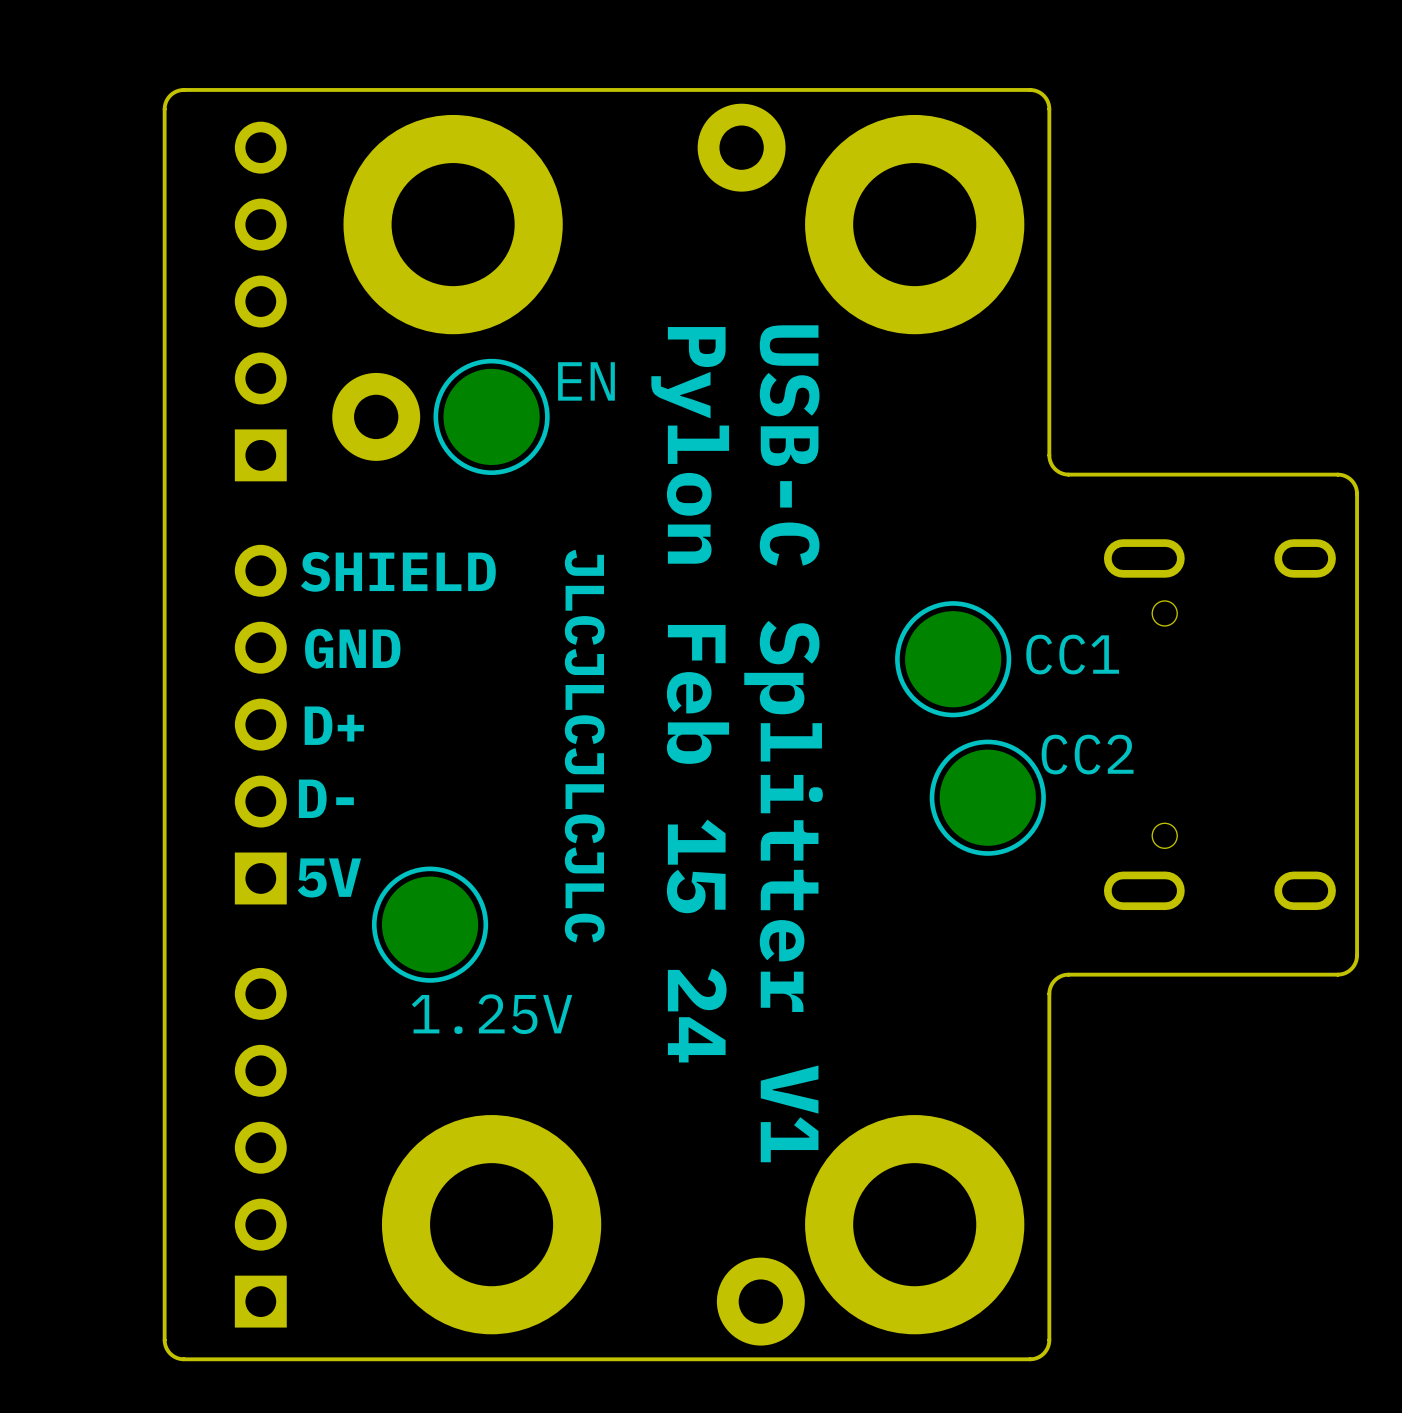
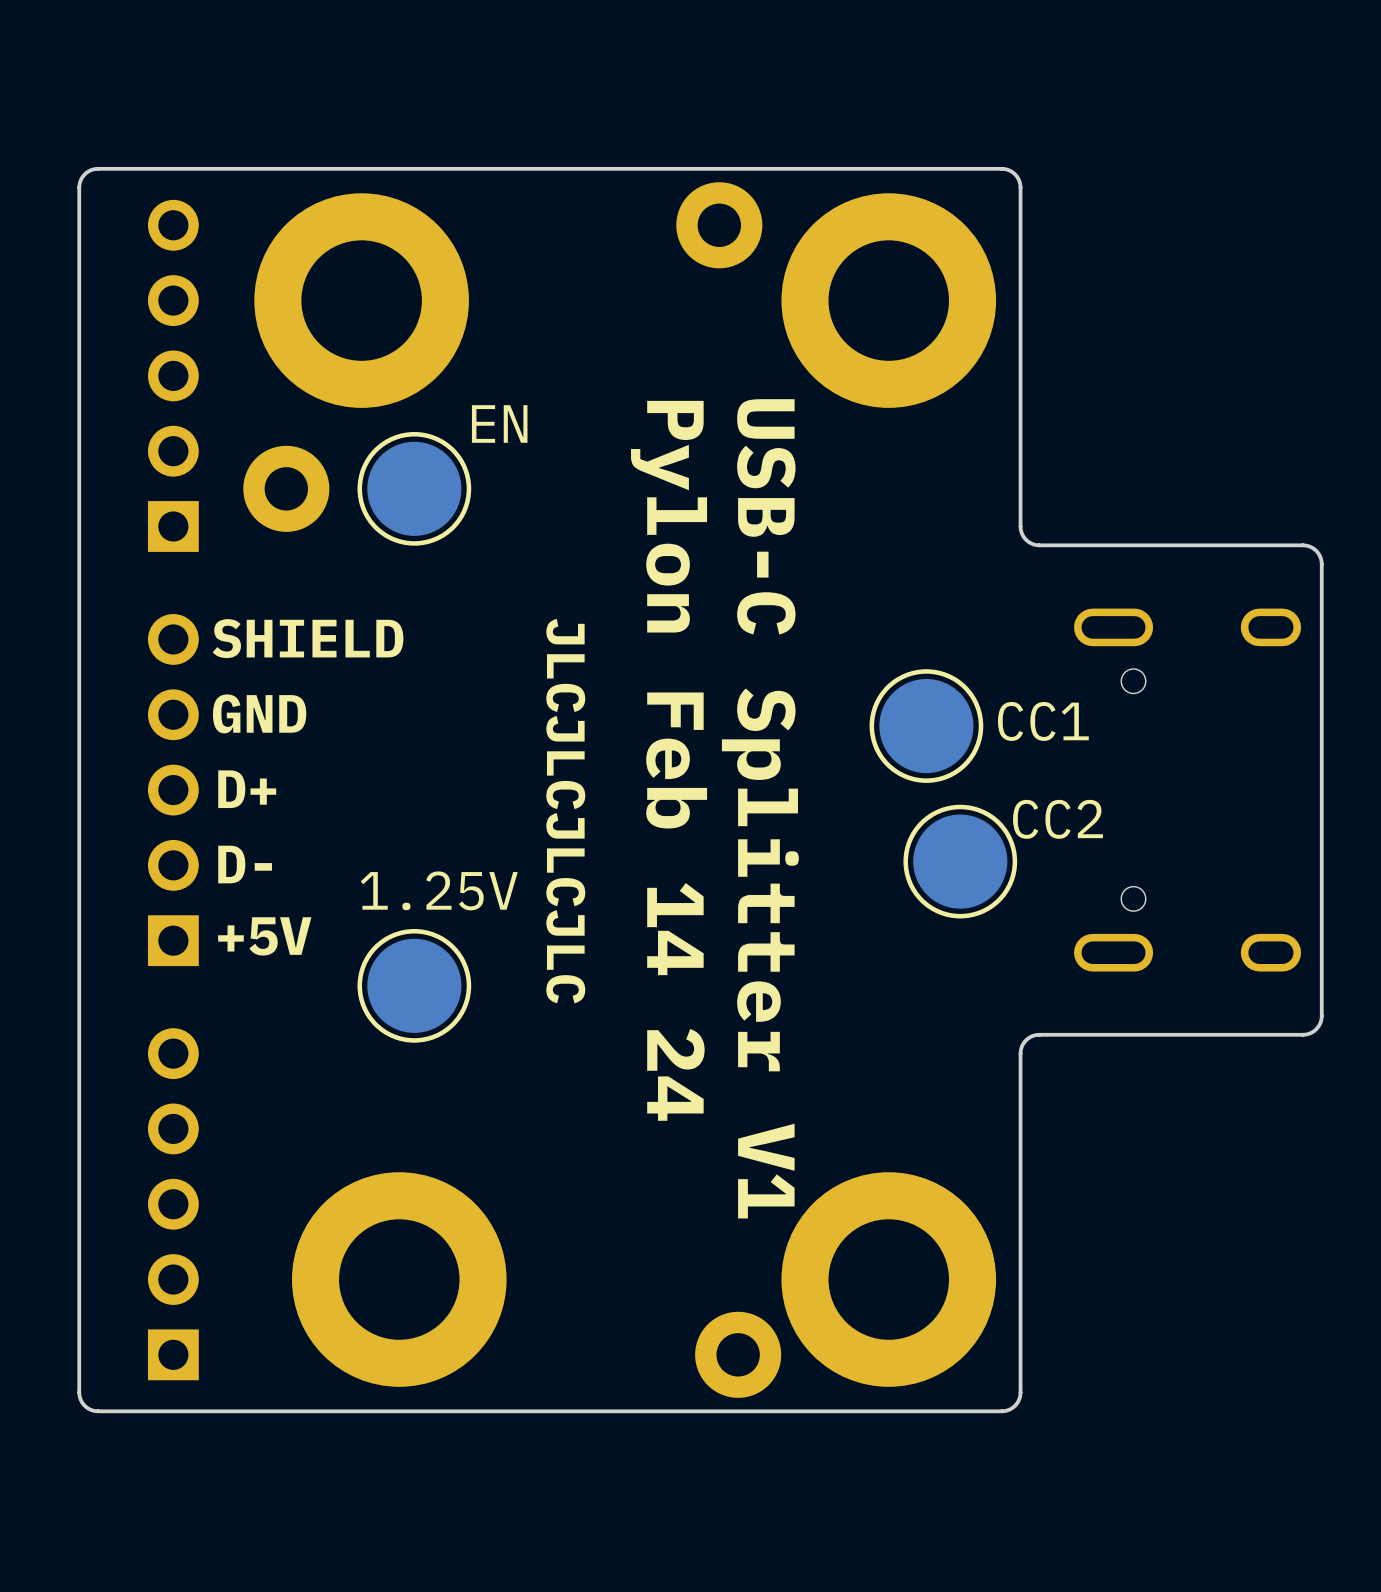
board edge: (183, 89) (170, 95) (164, 109) (164, 1340) (170, 1353) (183, 1359) -> (173, 168) (93, 169) (83, 176) (79, 187) (79, 1394) (84, 1405) (95, 1411) (173, 1411)
part position: (453, 224) -> (361, 300)
part position: (260, 301) -> (173, 375)
text position: EN (586, 381) -> EN (499, 423)
part position: (376, 416) -> (286, 488)
part position: (491, 416) -> (414, 488)
text position: SHIELD (398, 571) -> SHIELD (308, 638)
text position: GND (352, 648) -> GND (259, 713)
text: Pylon Feb 15 24 (690, 694) -> Pylon Feb 14 24 (669, 760)
part position: (260, 724) -> (173, 790)
text position: D+ (334, 725) -> D+ (247, 789)
text position: D- (326, 798) -> D- (245, 864)
text: 5V (329, 877) -> +5V (264, 936)
text position: 1.25V (492, 1014) -> 1.25V (439, 890)
part position: (260, 1147) -> (173, 1204)
part position: (491, 1224) -> (399, 1279)

